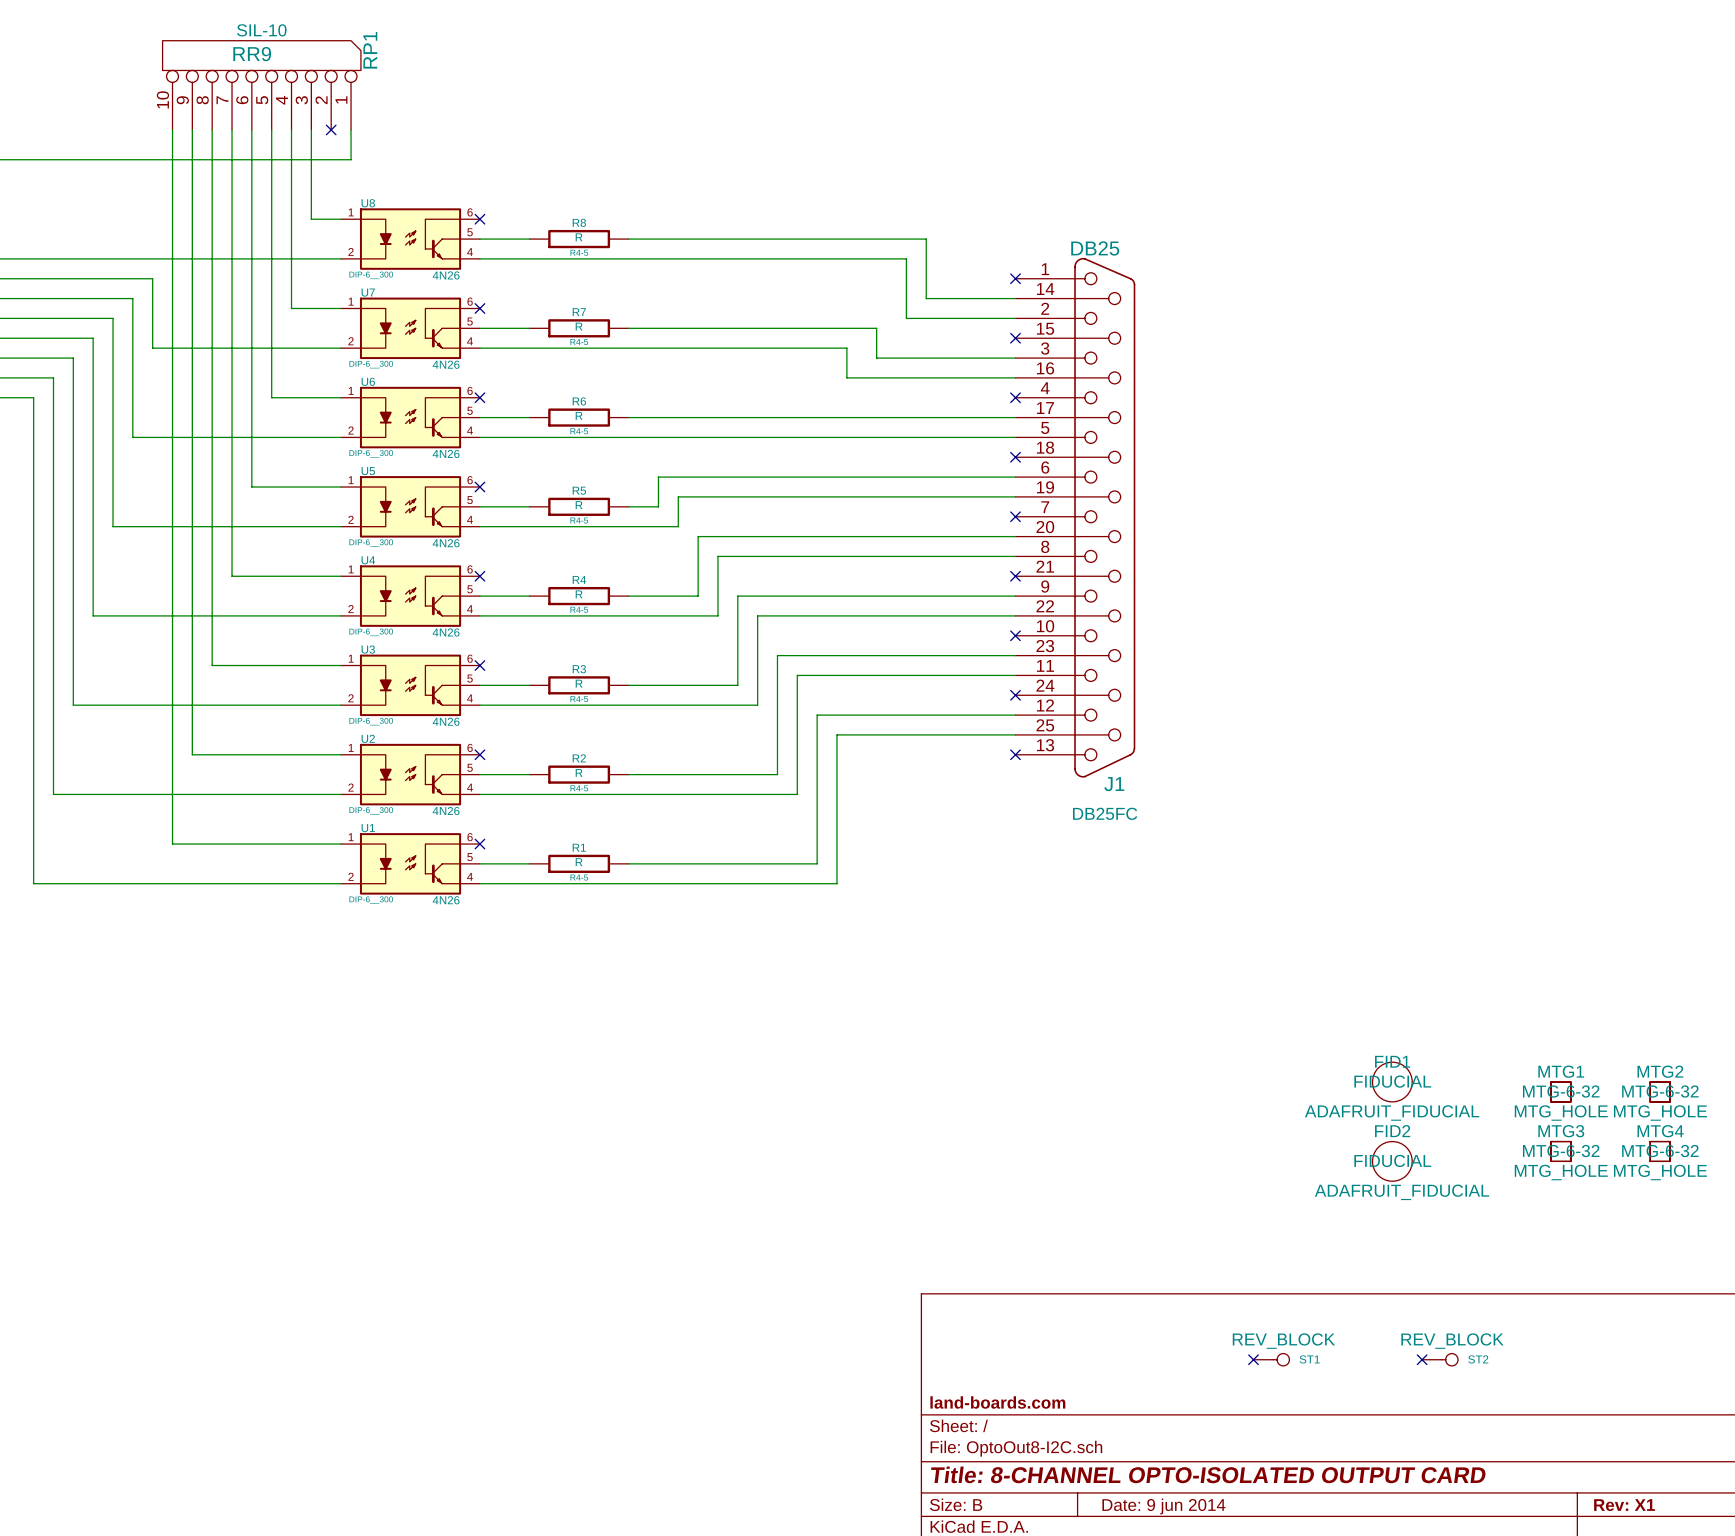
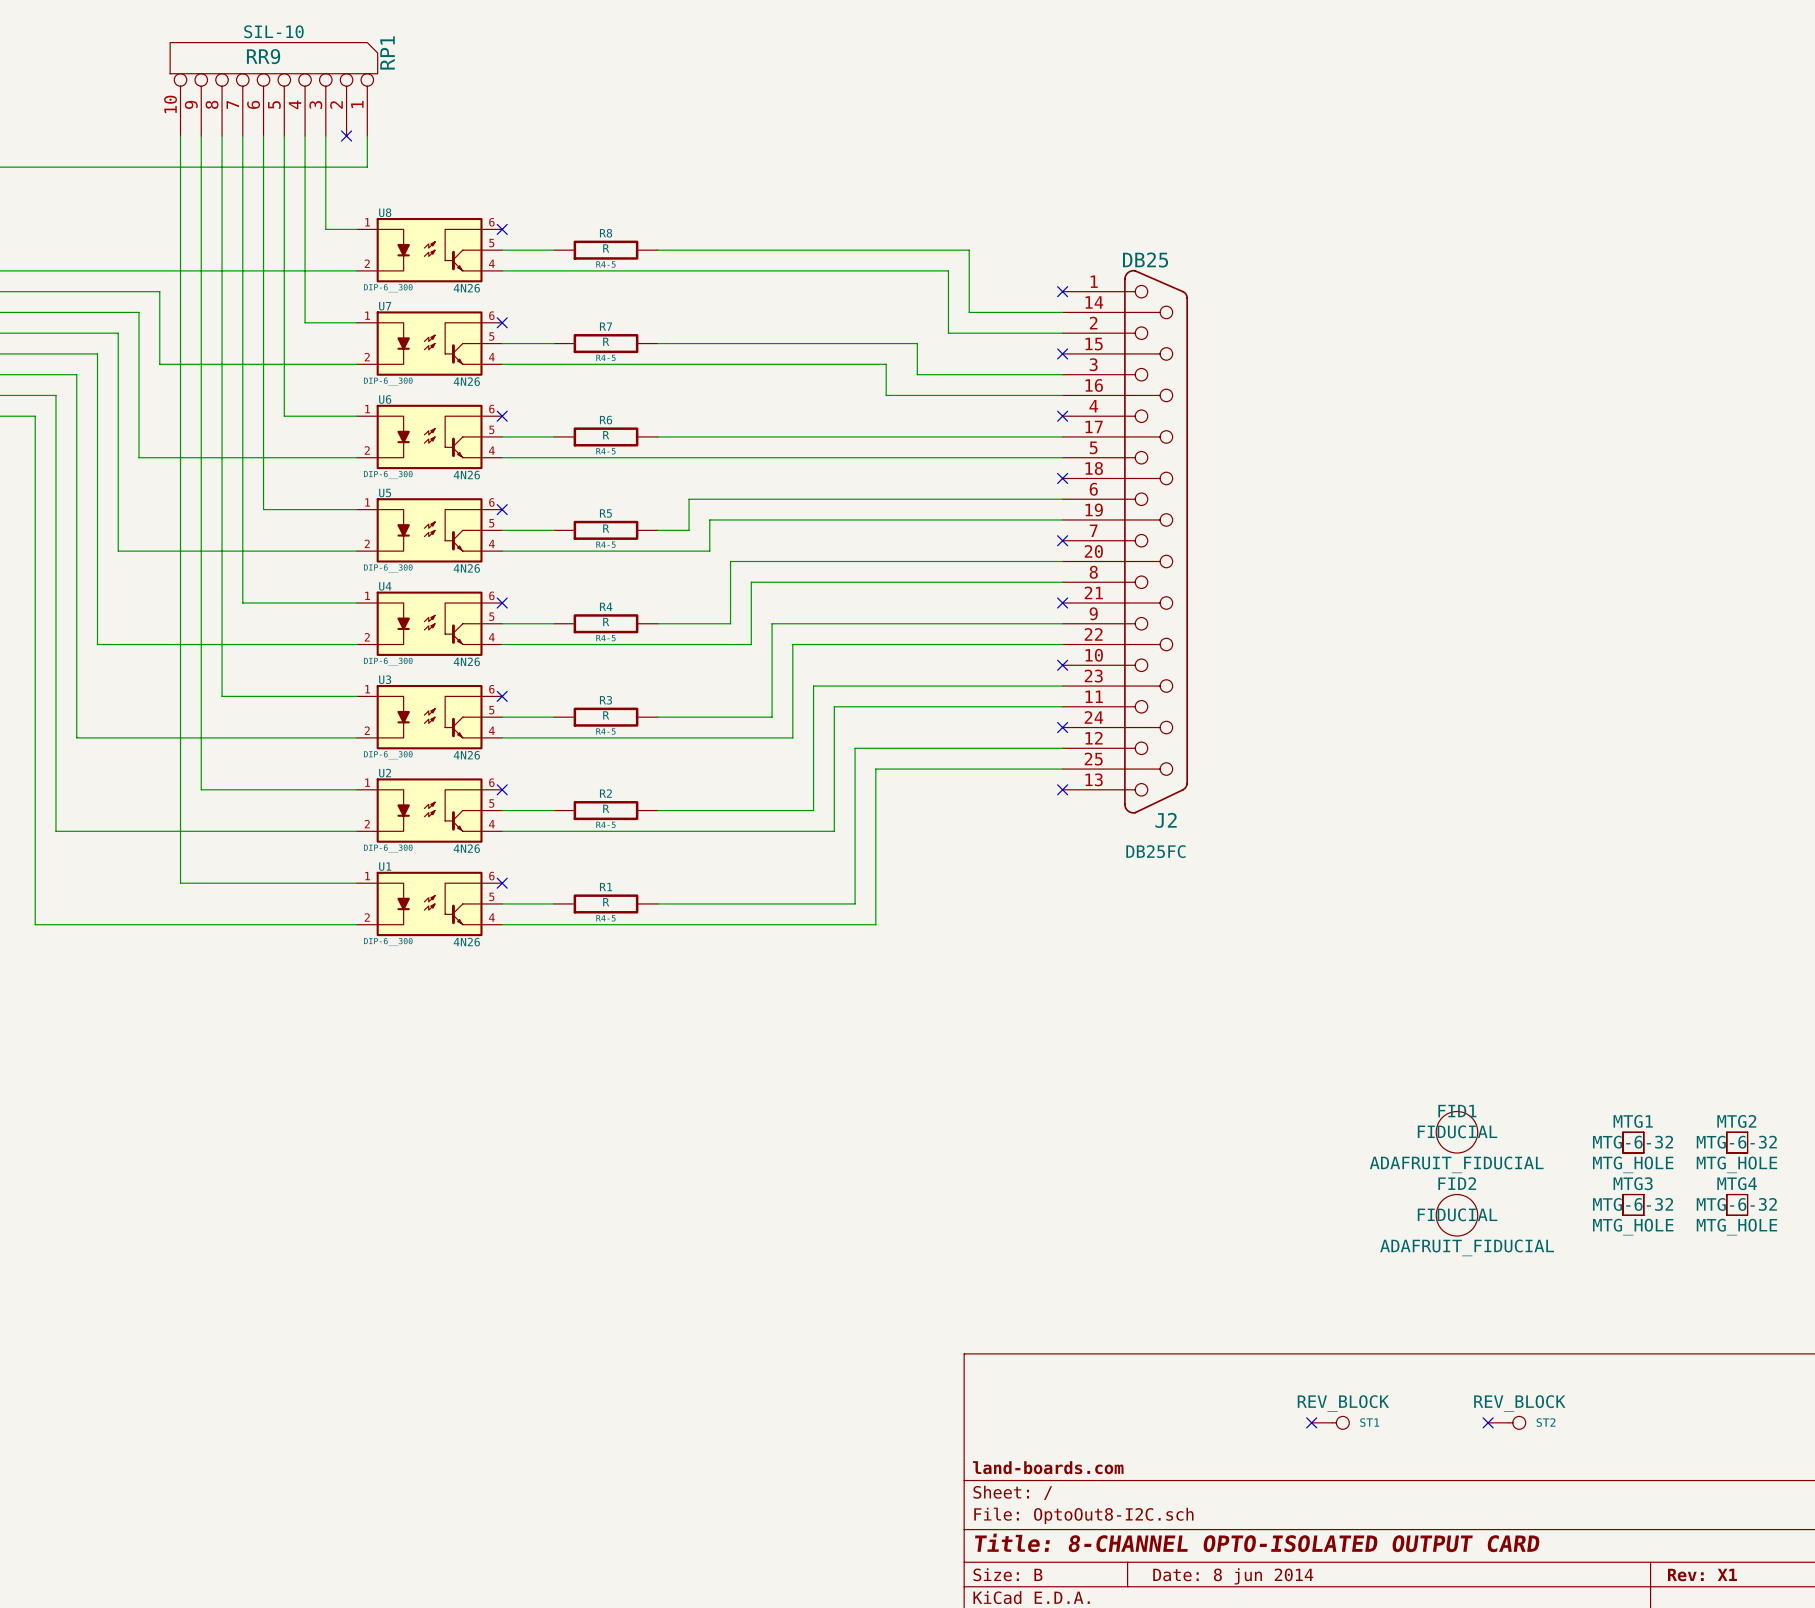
J1 name: J1 (1114, 784) -> J2 (1166, 820)
title block: Date: 9 jun 2014 (1163, 1506) -> Date: 8 jun 2014 (1233, 1576)

